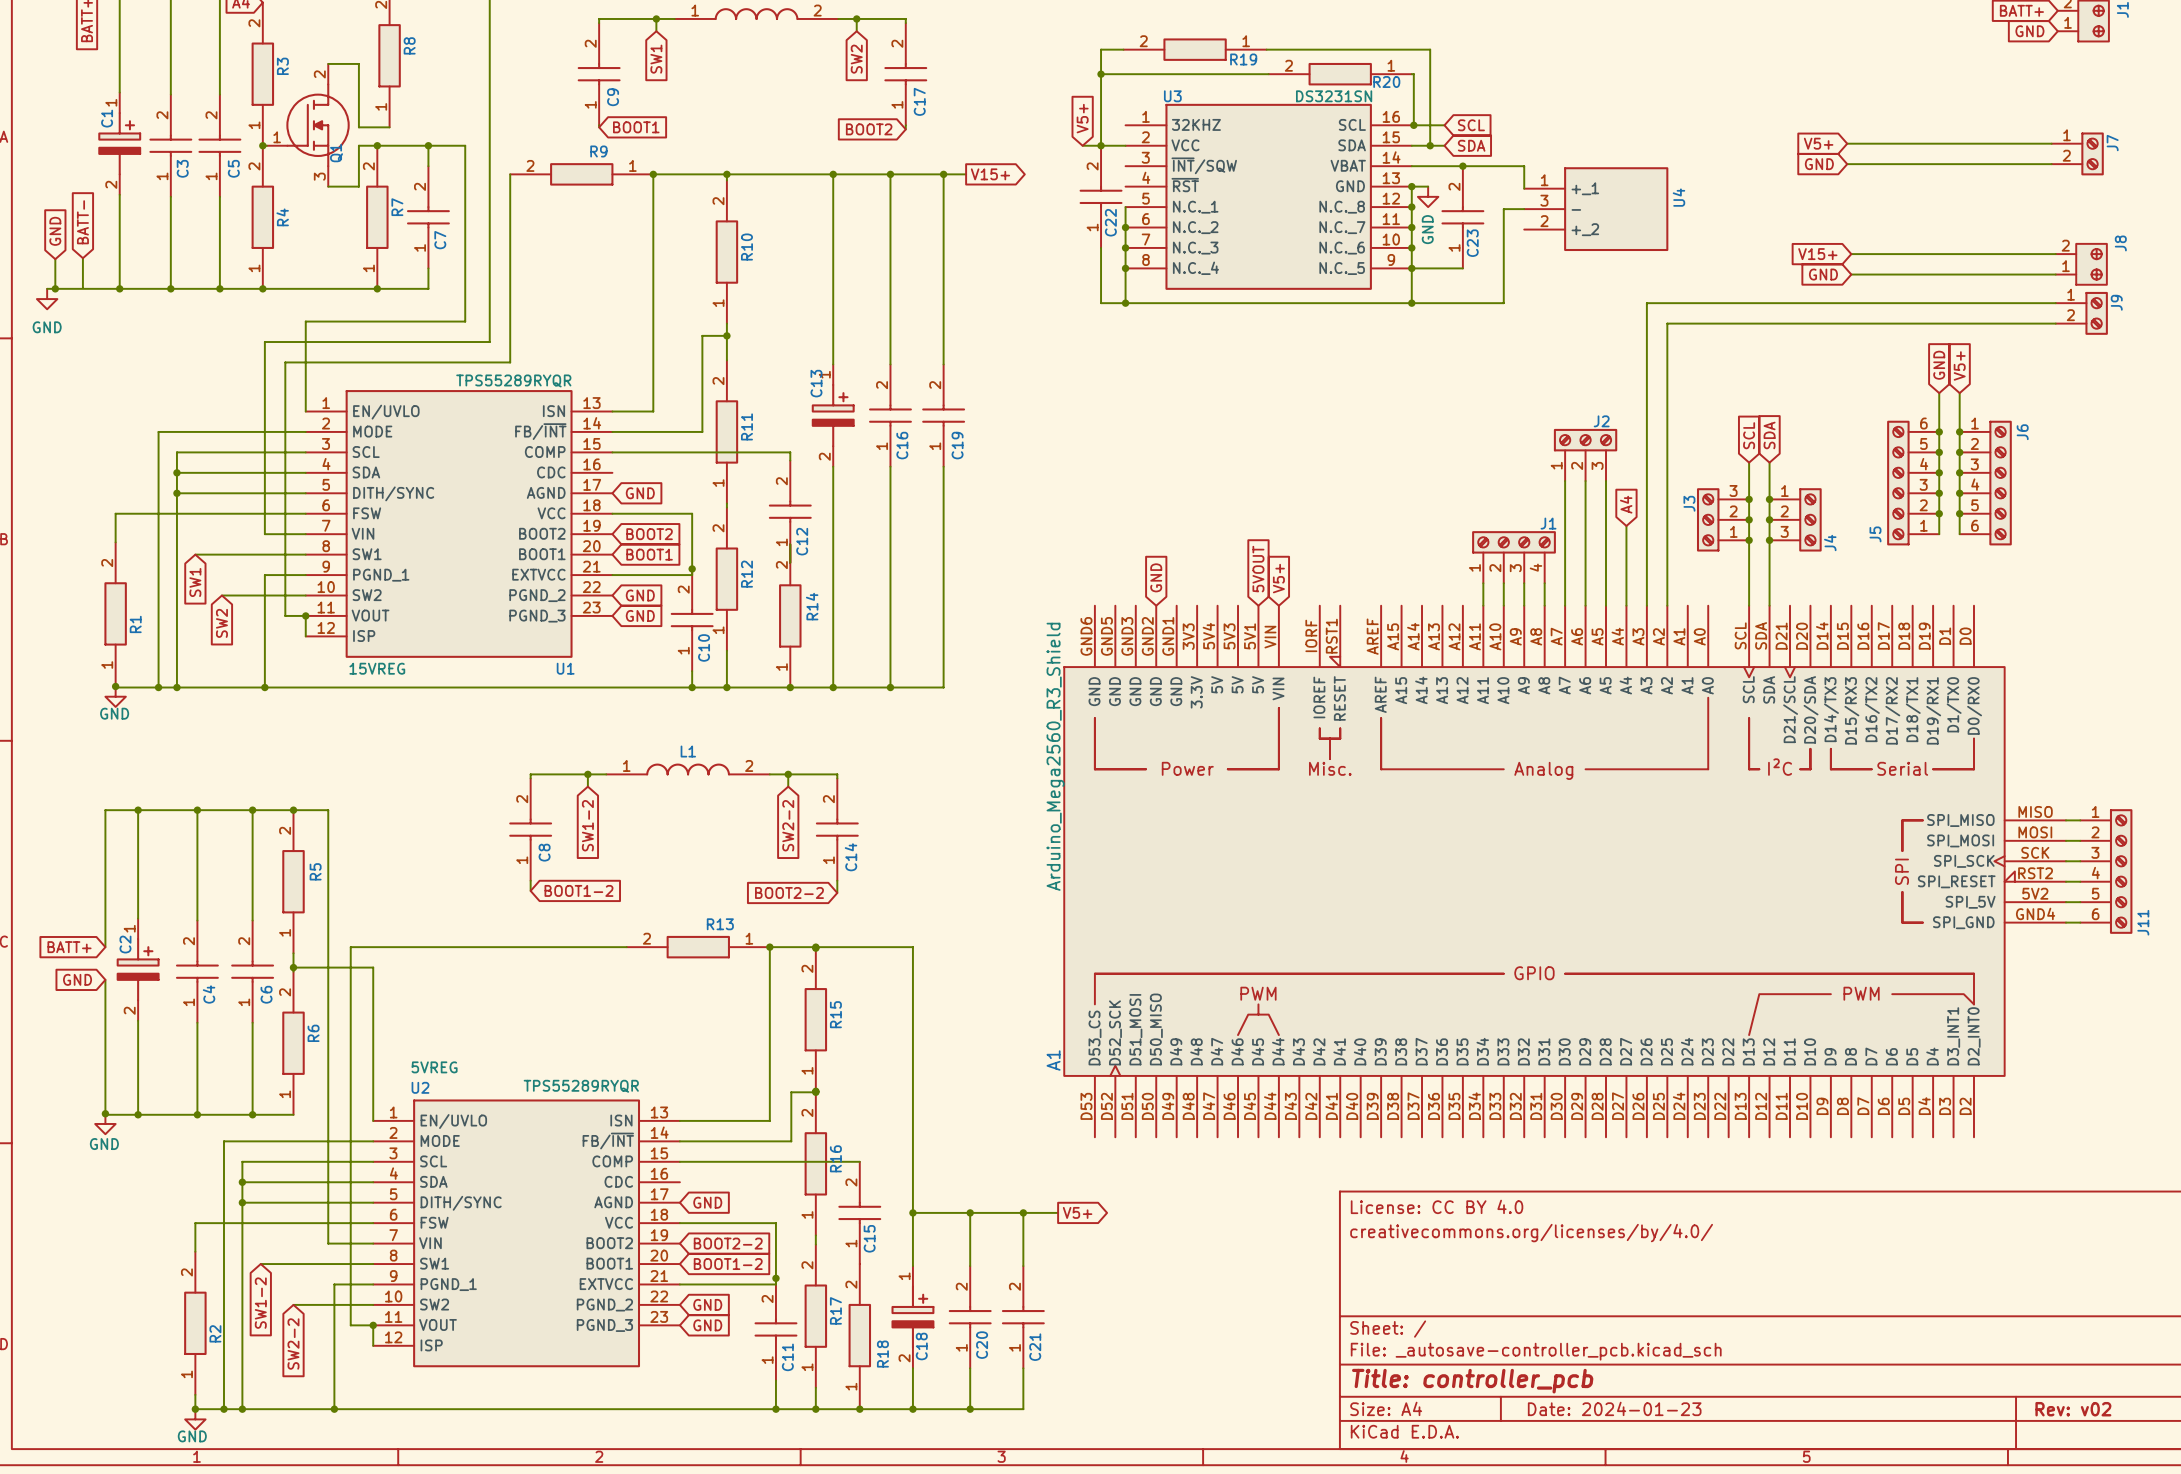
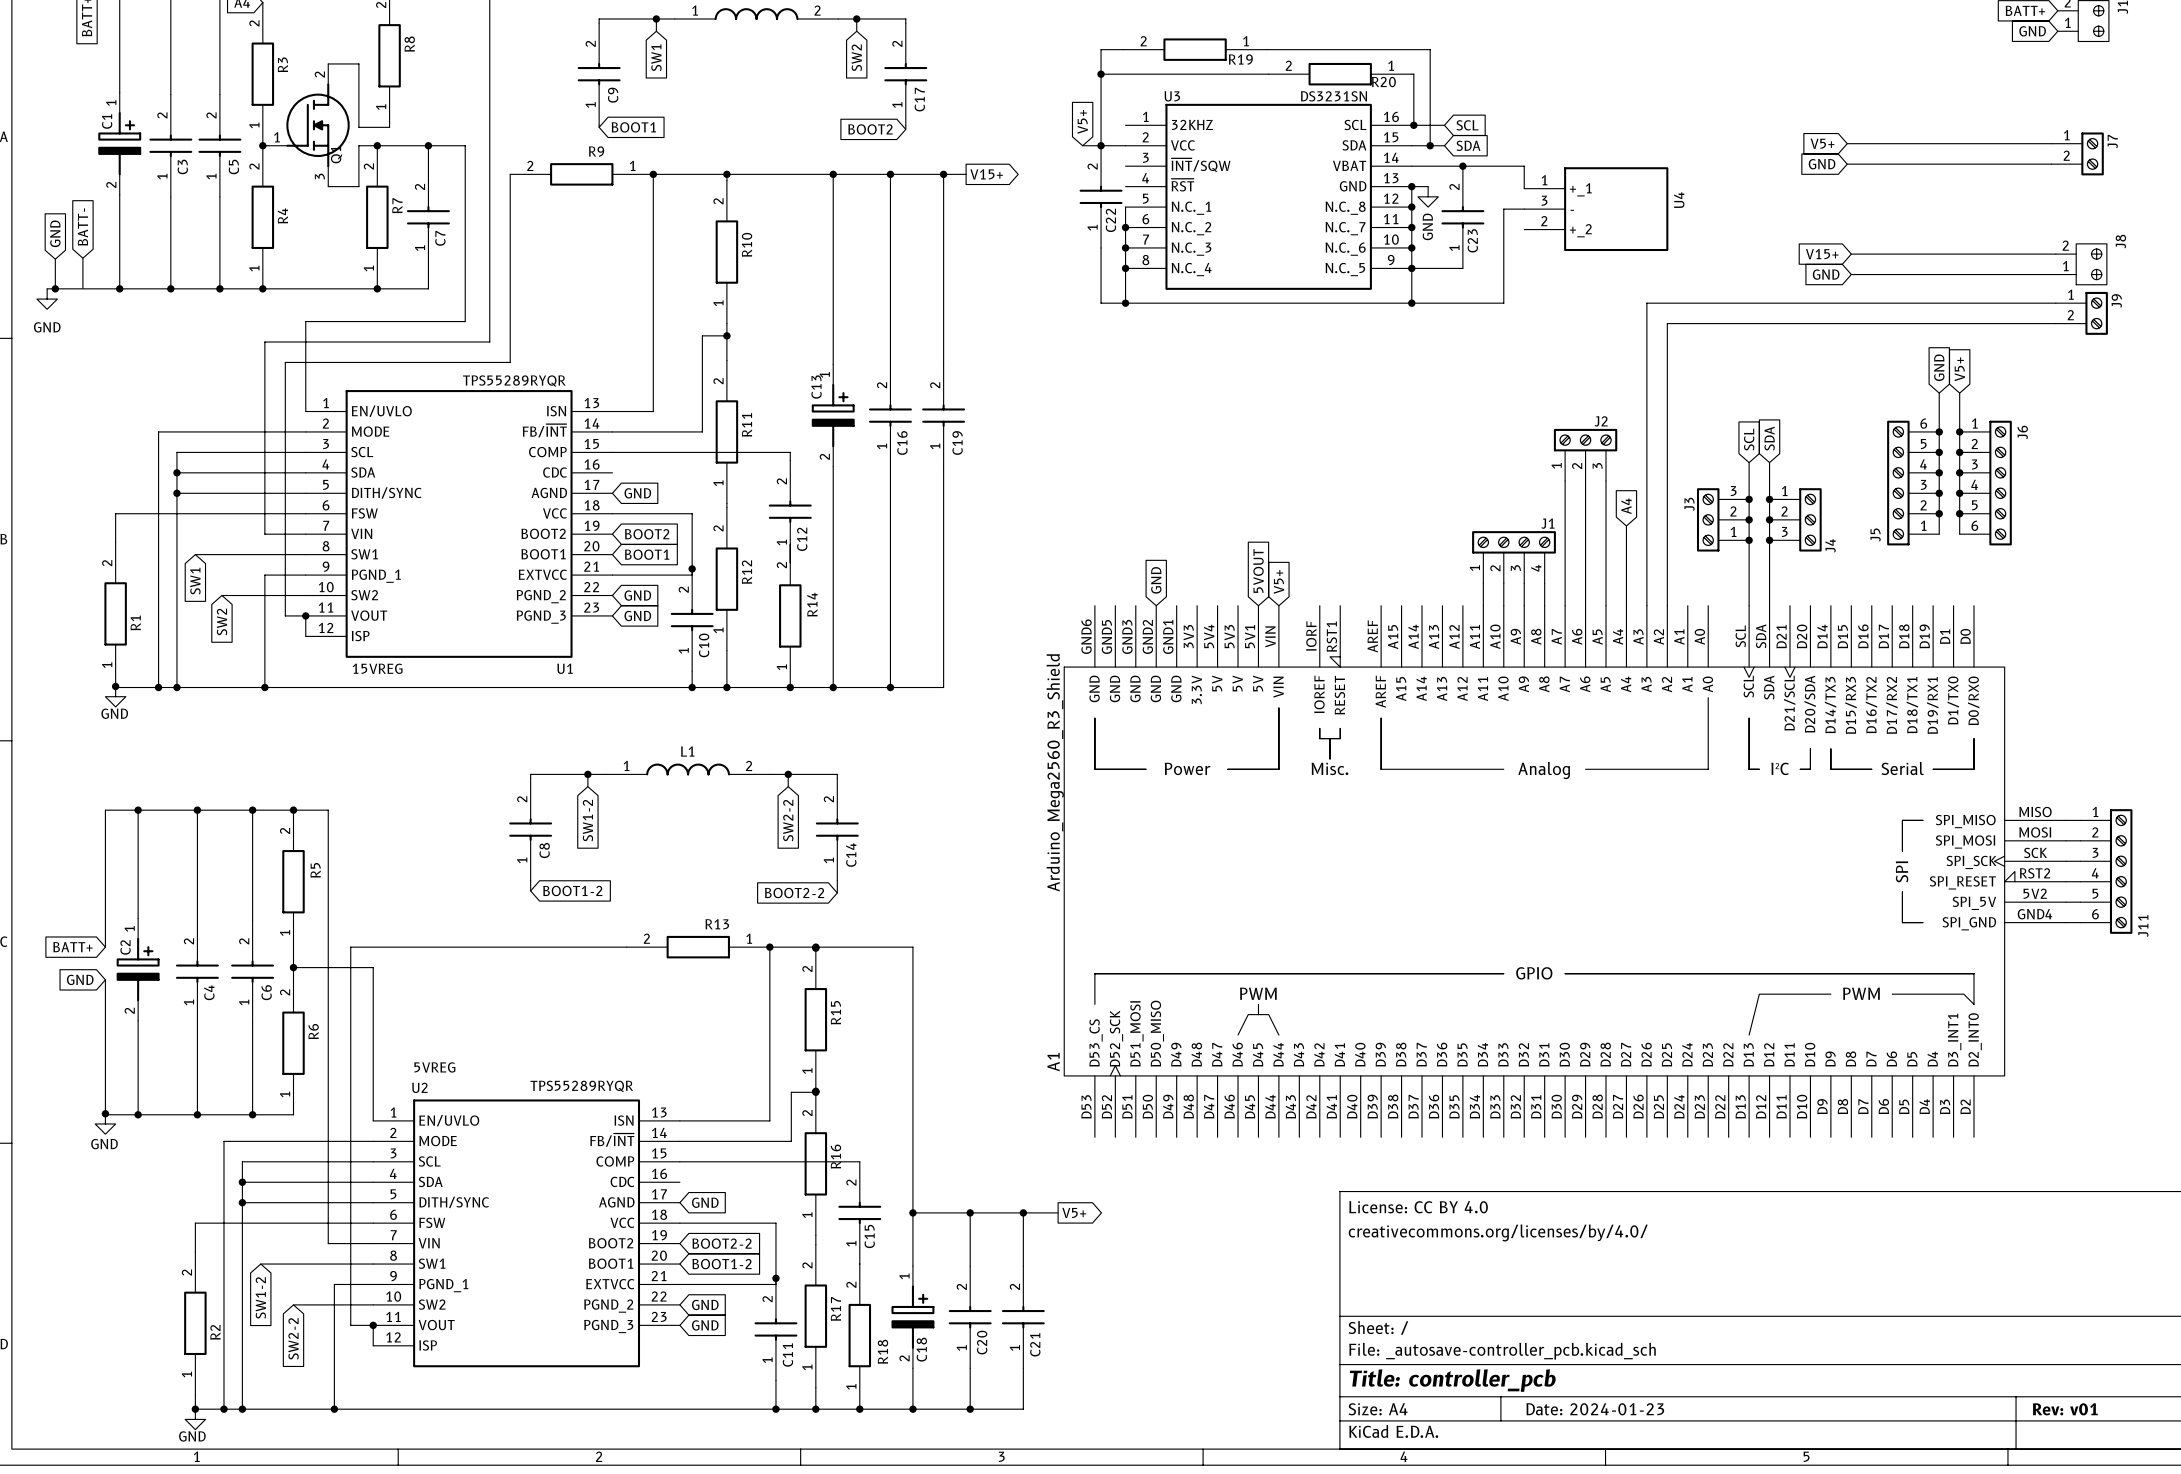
title block: Rev: v02 (2073, 1409) -> Rev: v01 (2065, 1409)

